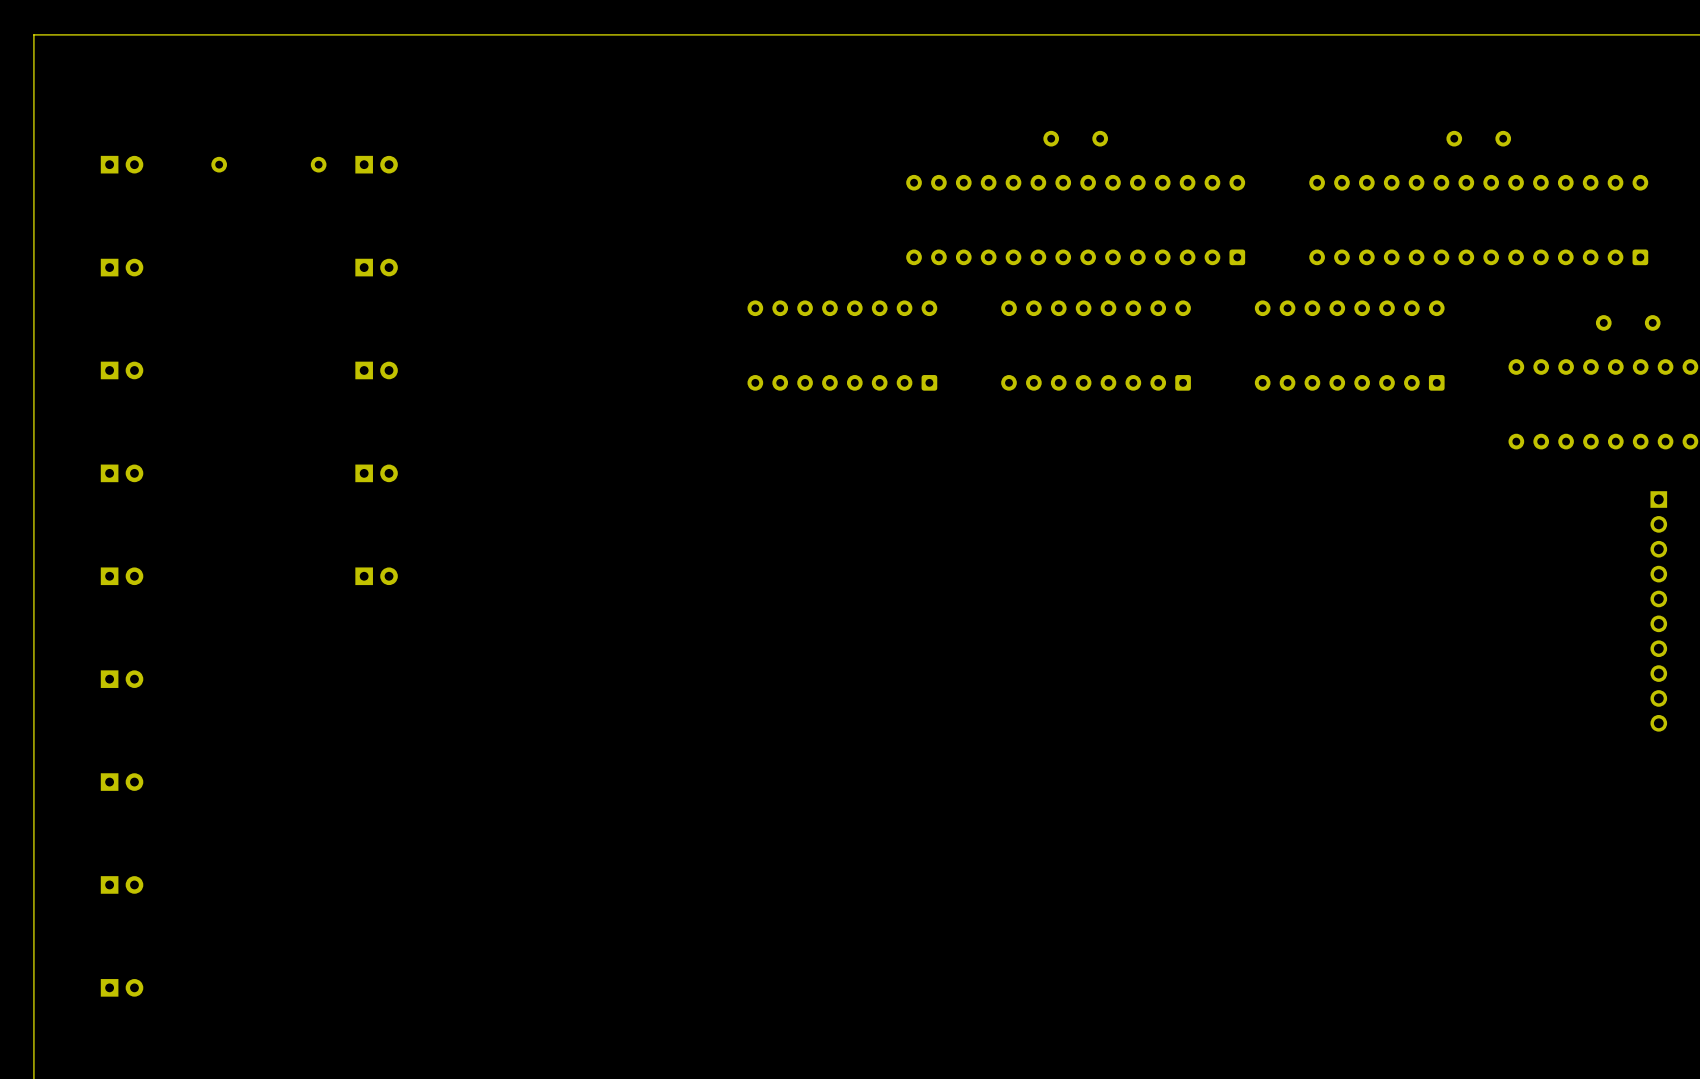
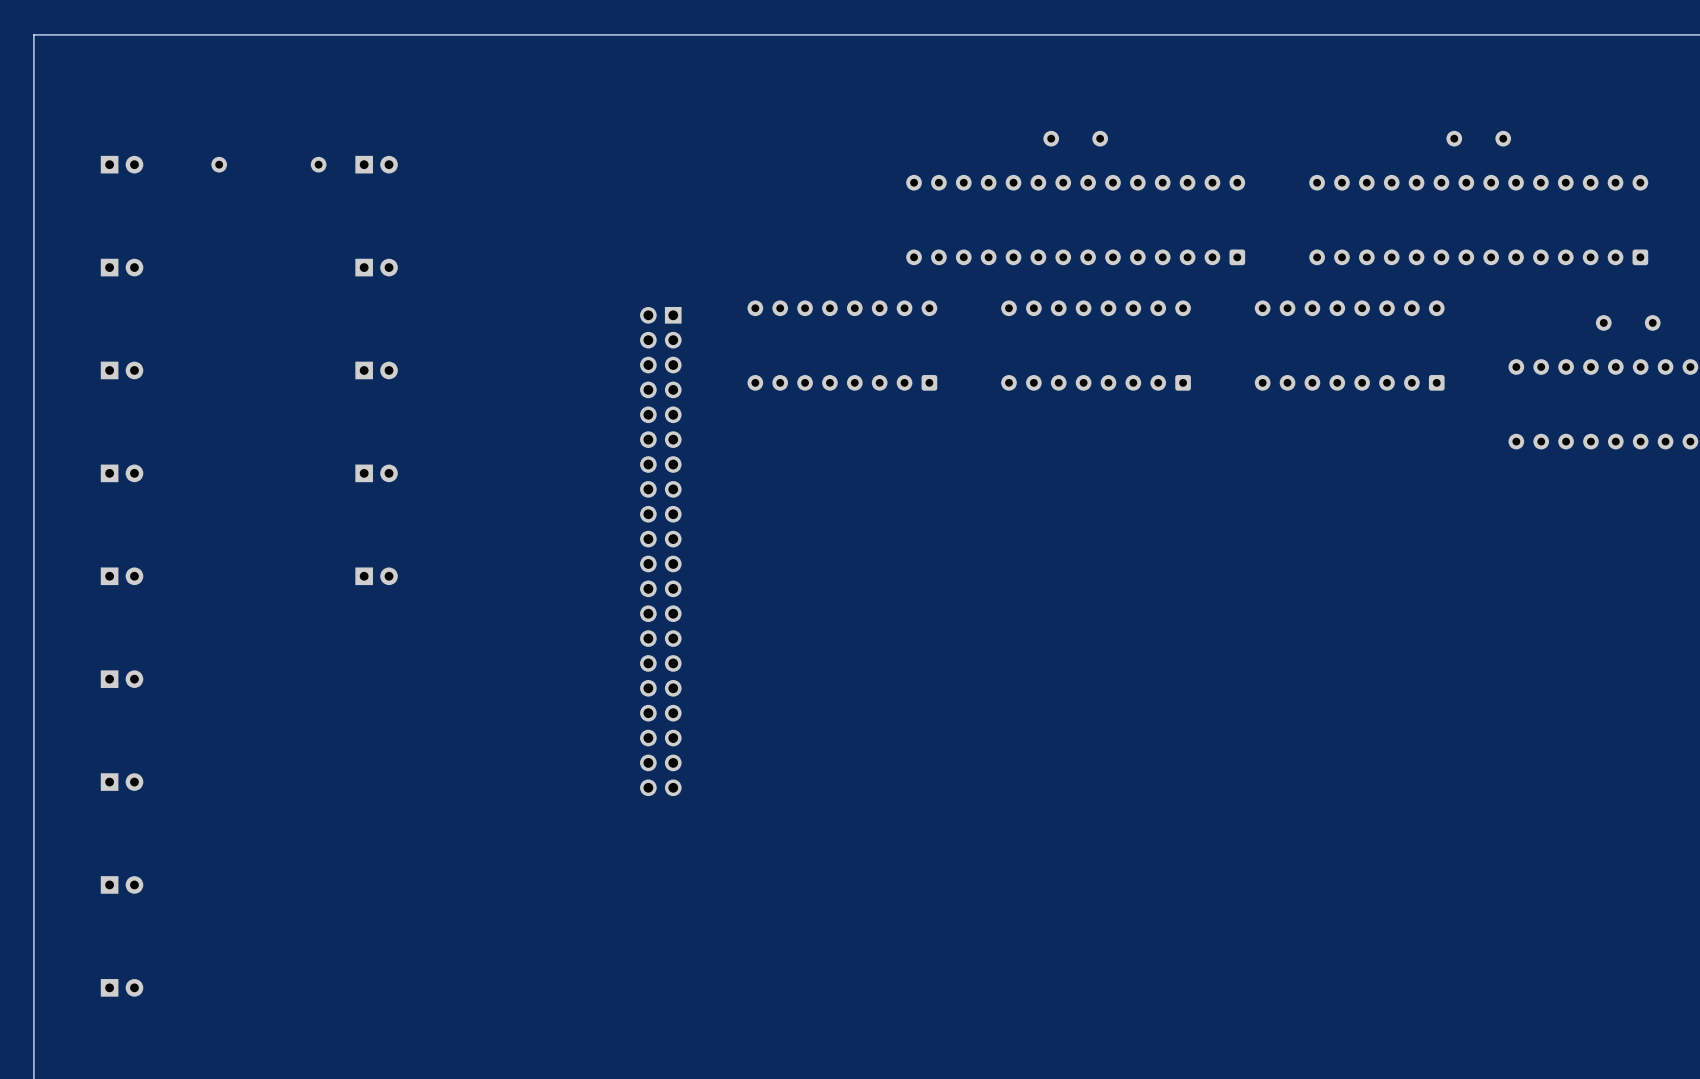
part: none -> (660, 551)
part: (1658, 611) -> none

